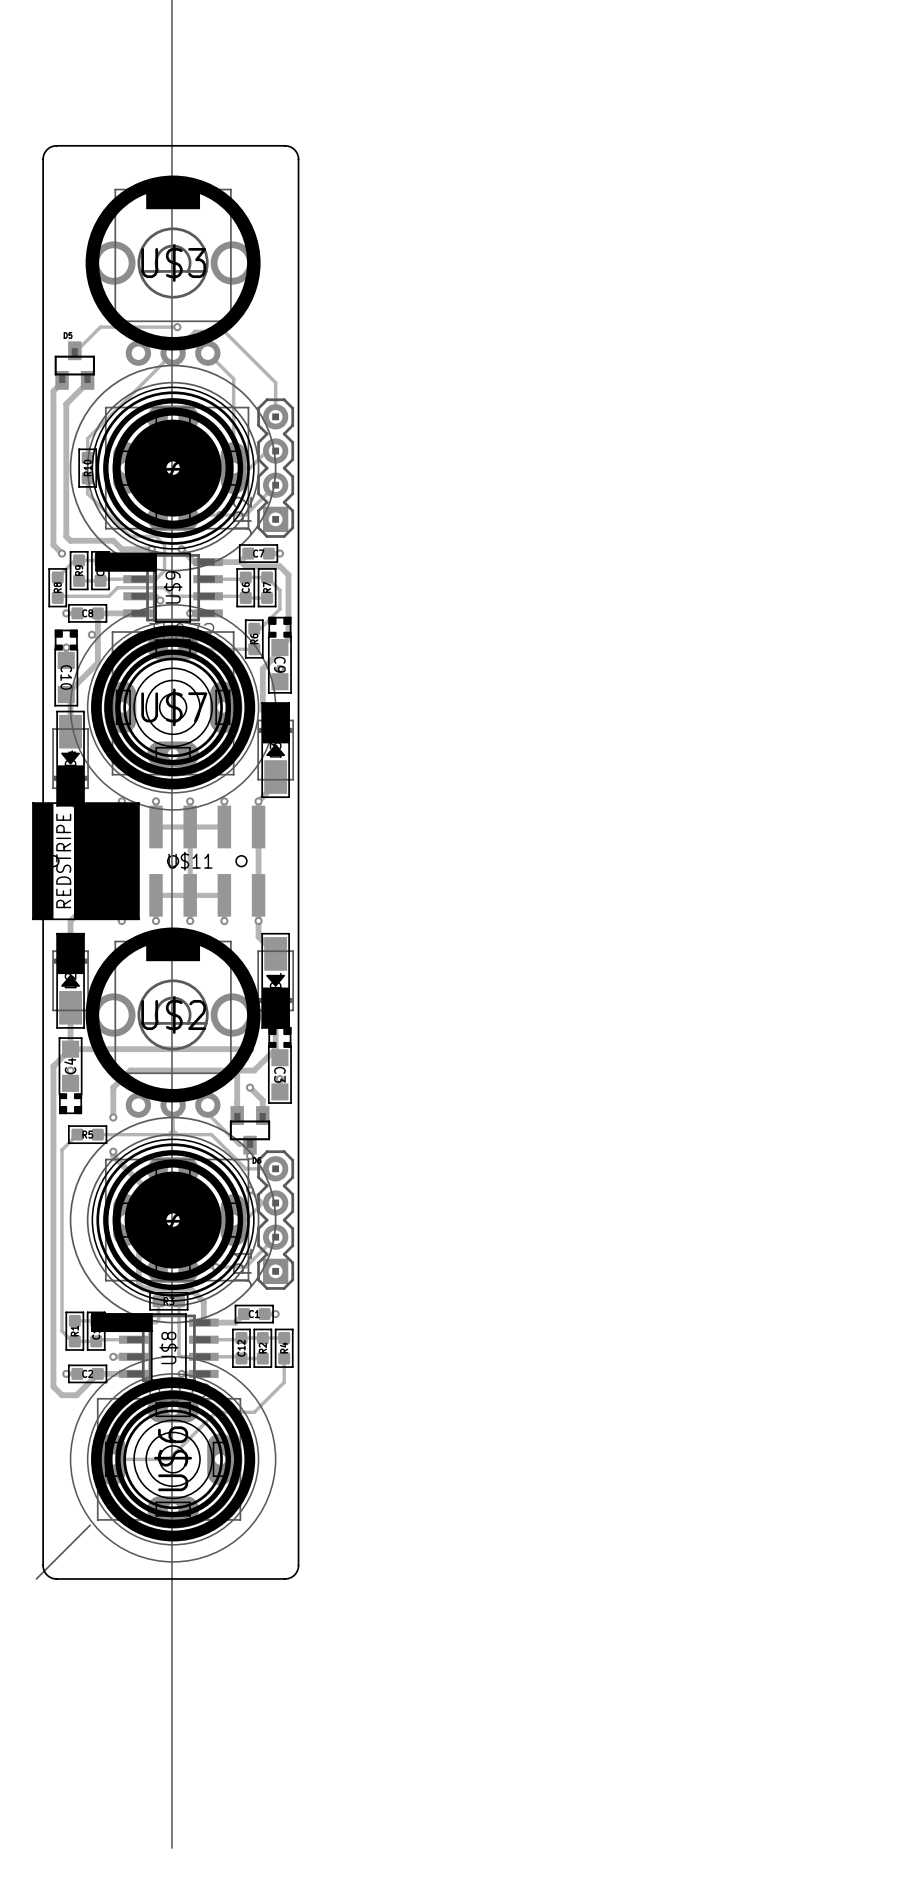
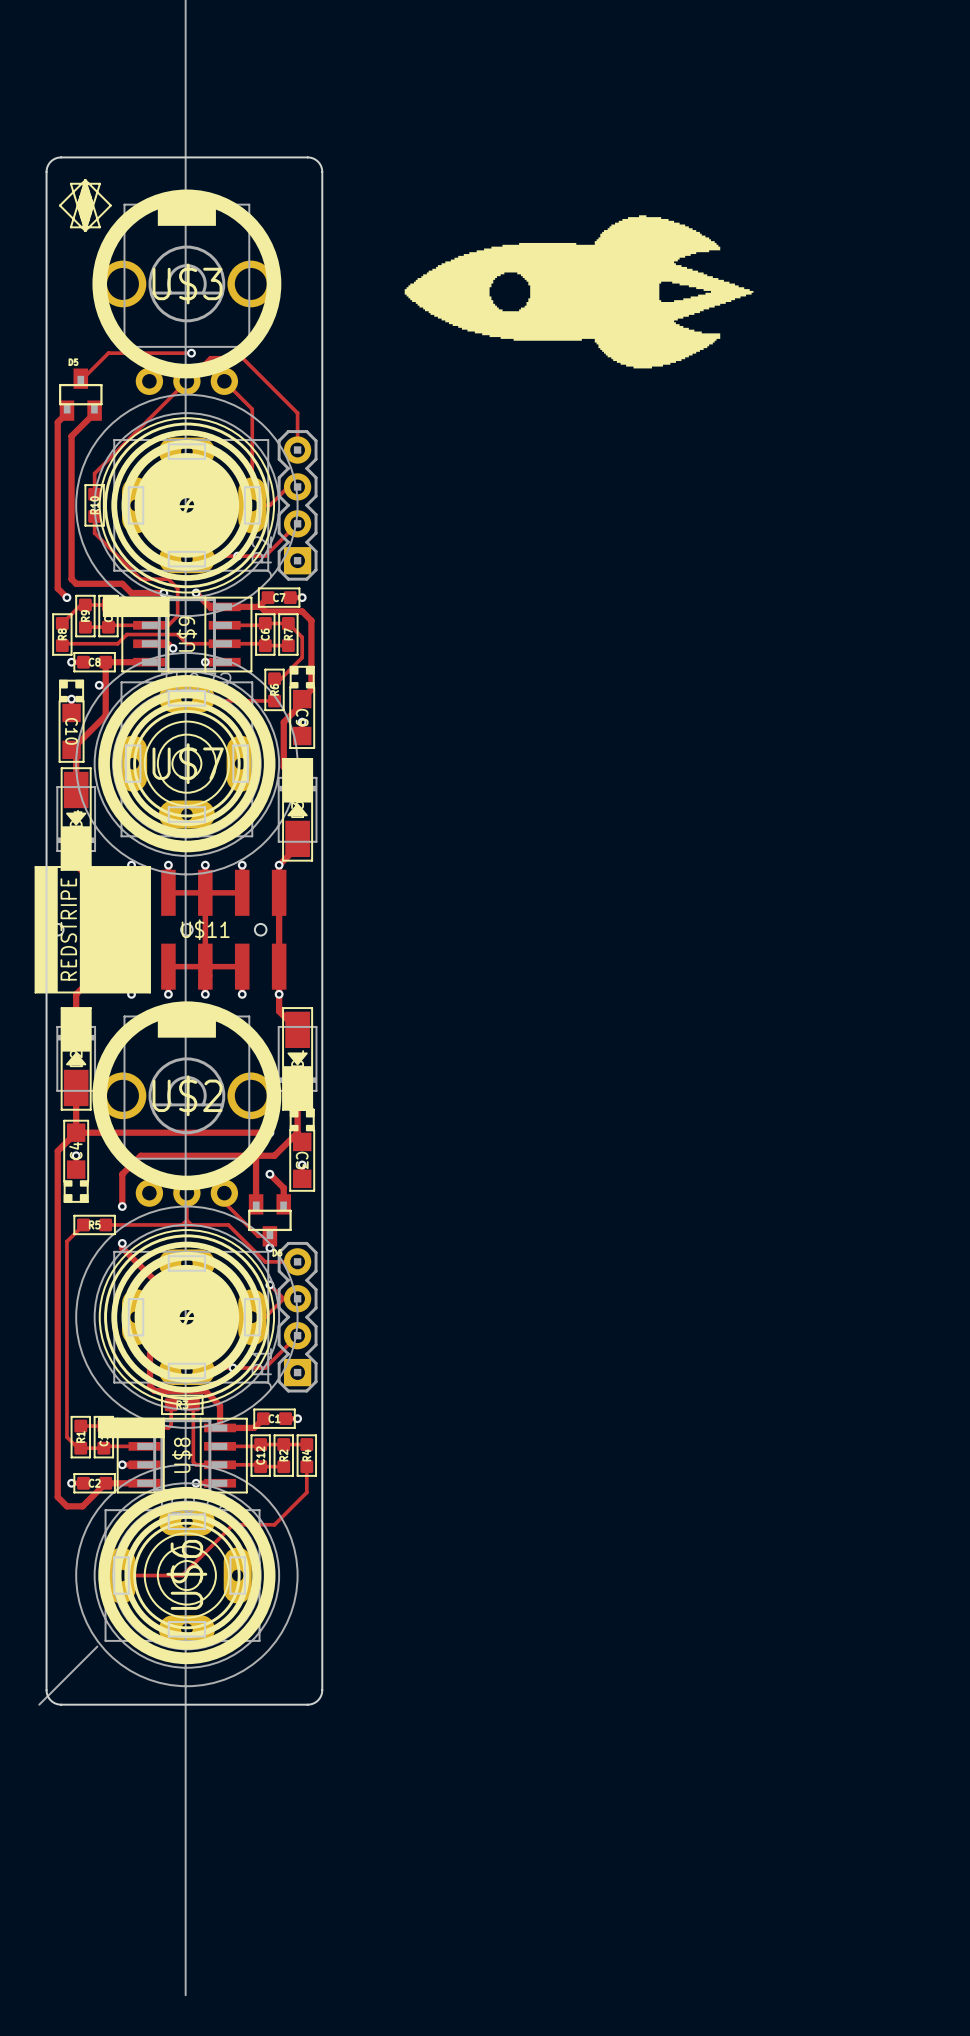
drawing: none -> [59, 179, 112, 232]
drawing: none -> [404, 215, 754, 369]
U$9 footprint: [95, 552, 223, 623] -> [102, 596, 253, 673]
U$8 footprint: [91, 1313, 219, 1384] -> [98, 1417, 248, 1494]

